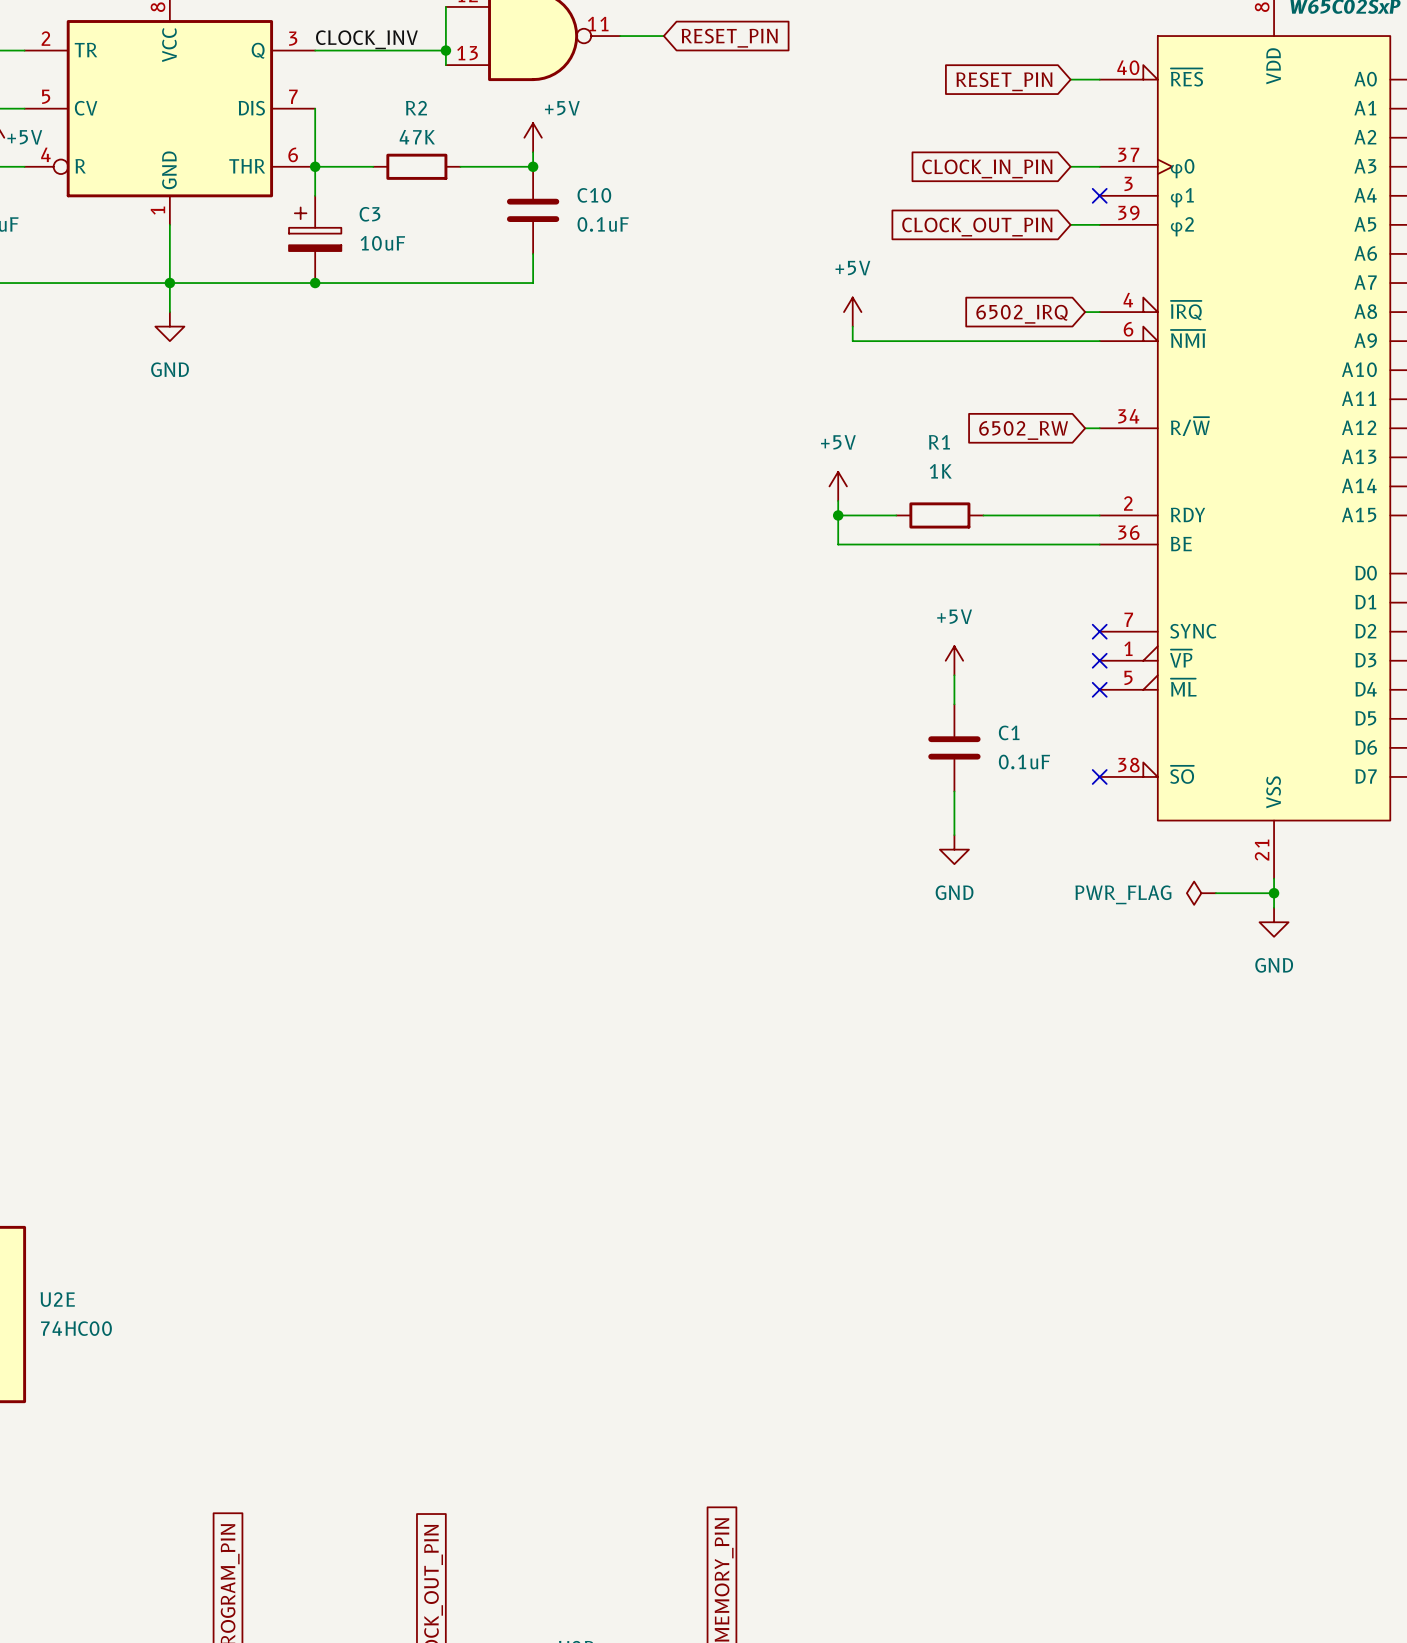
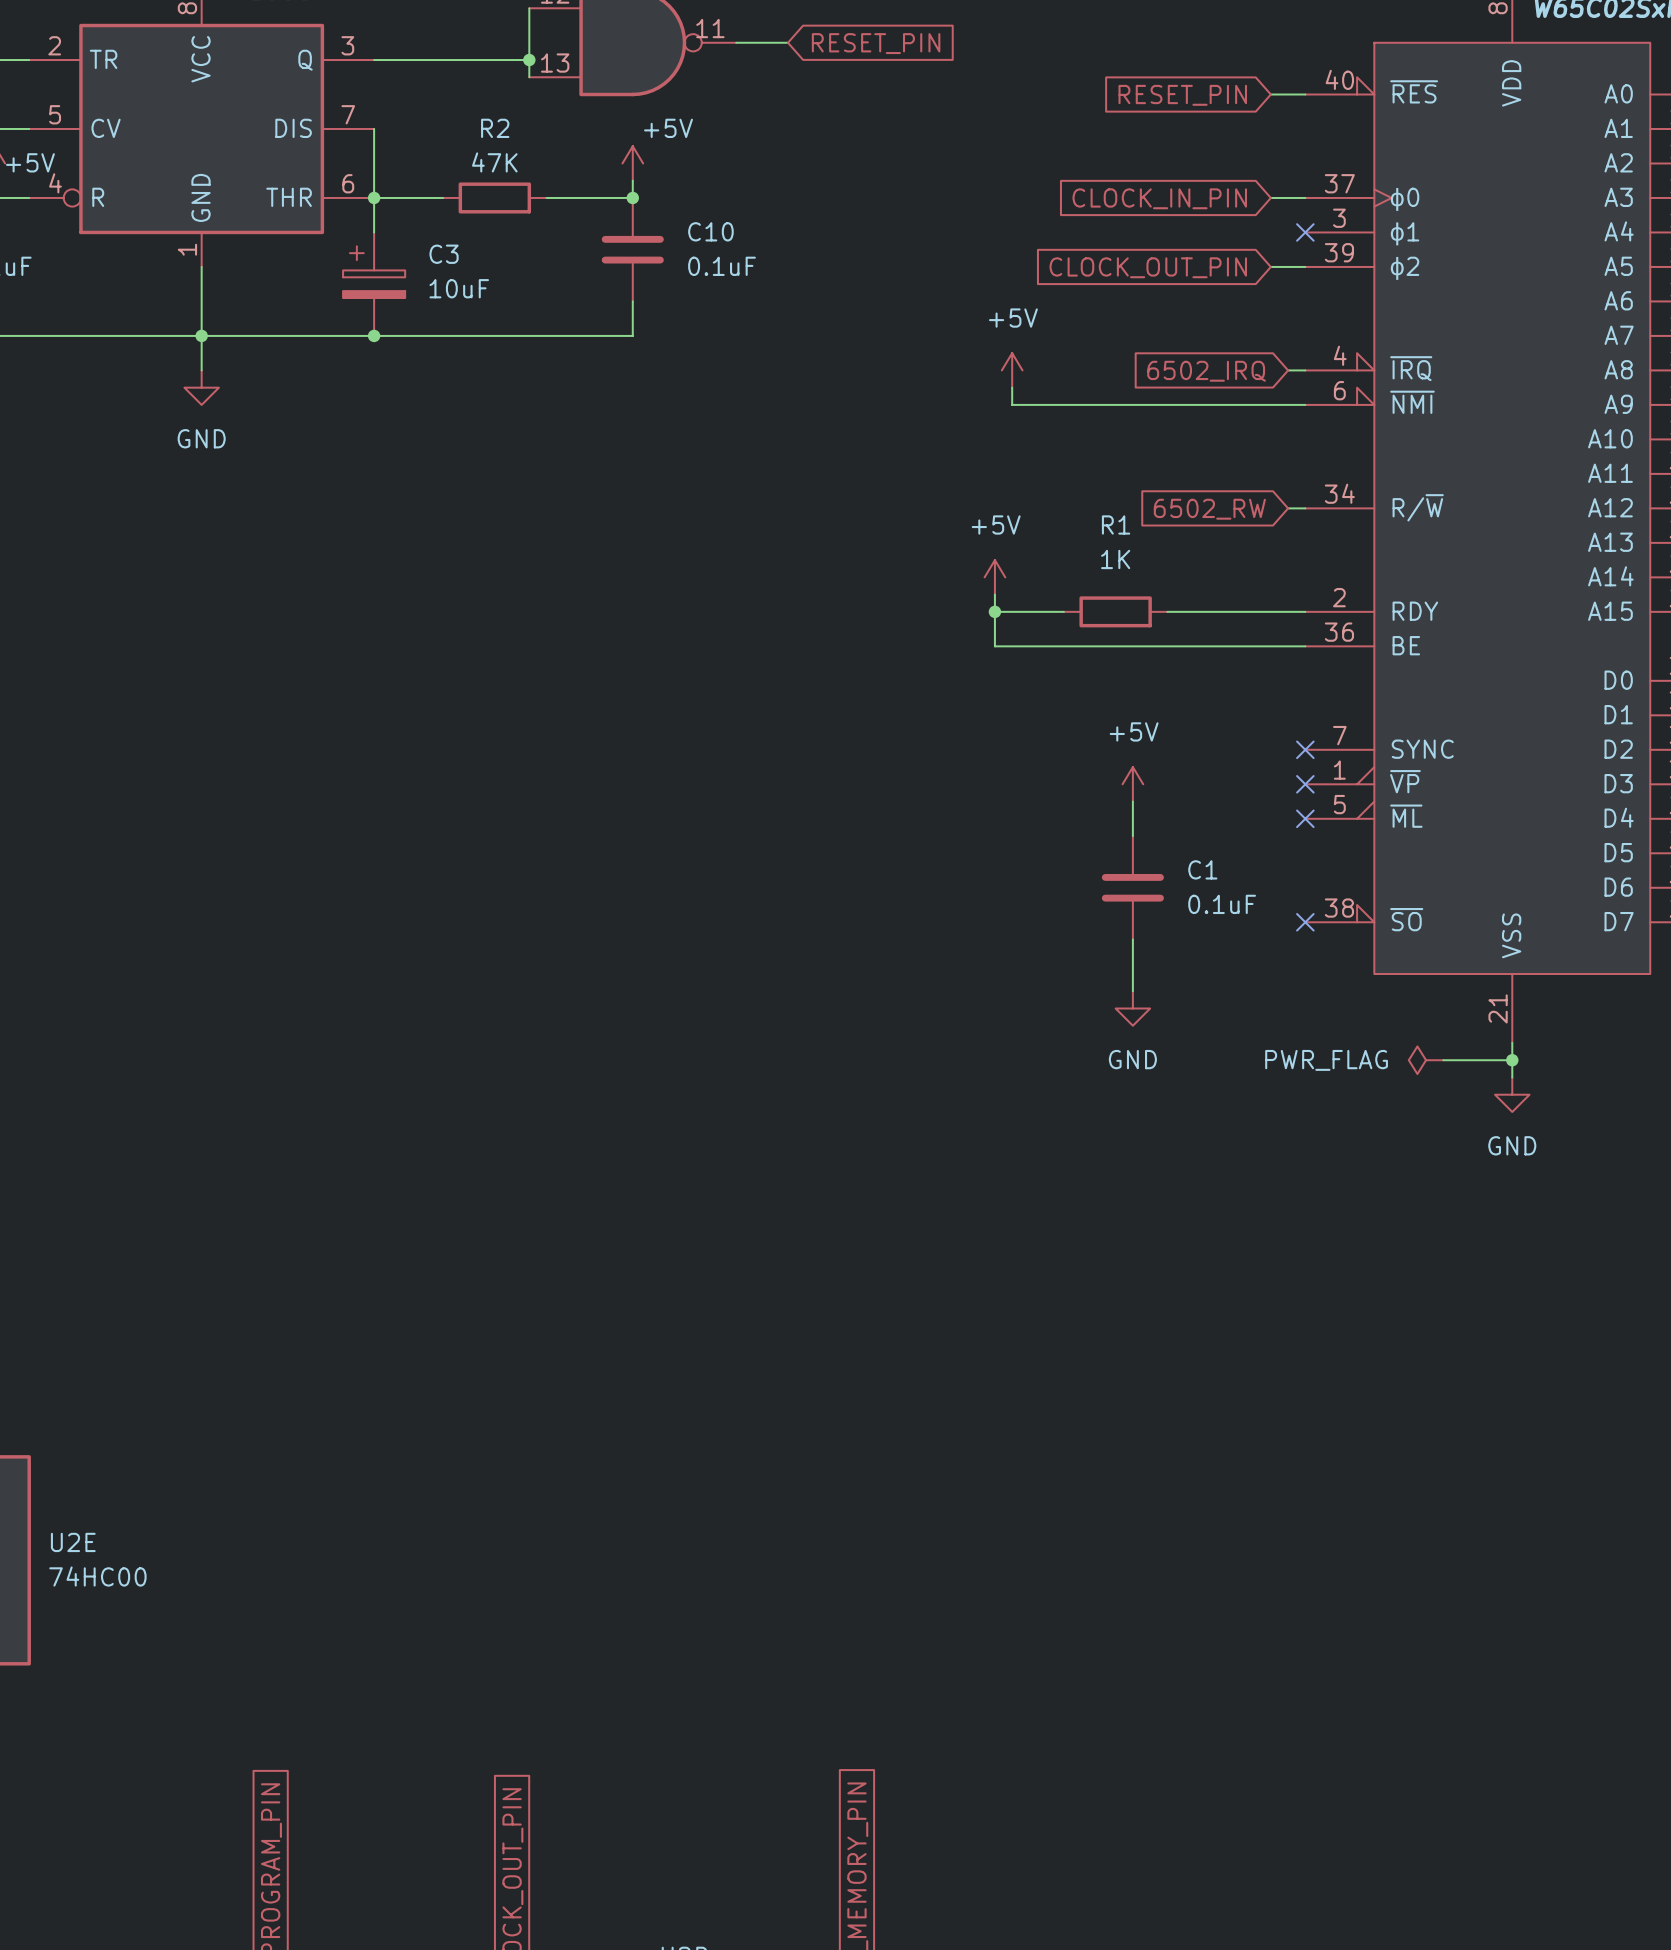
label: CLOCK_INV (366, 39) -> none

